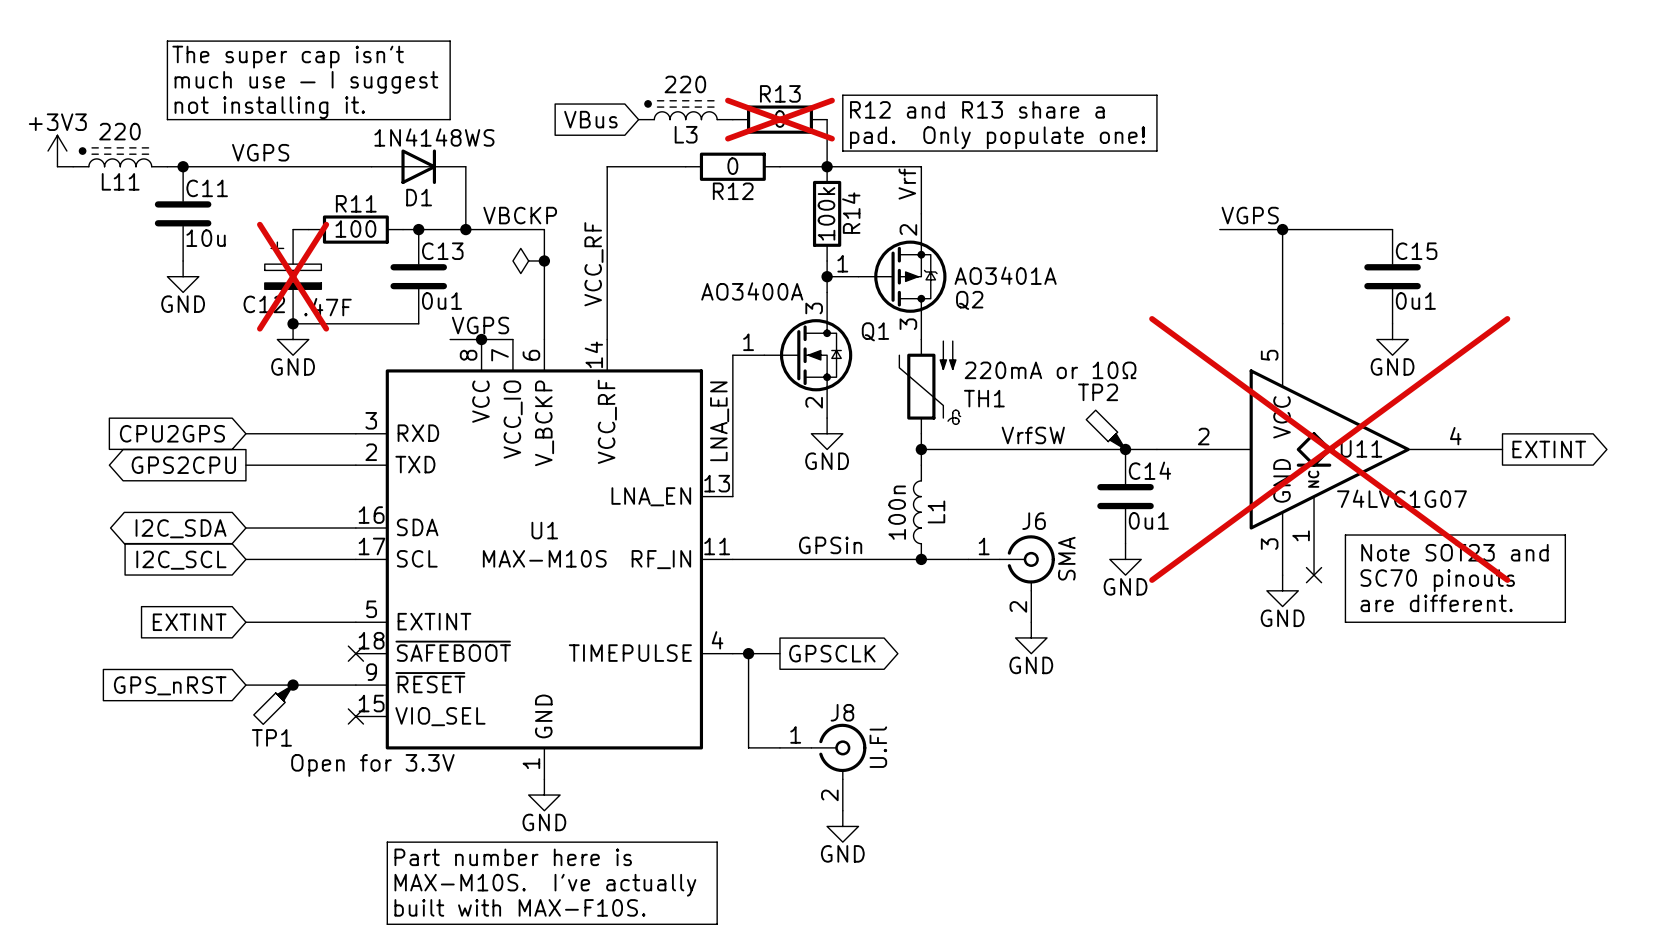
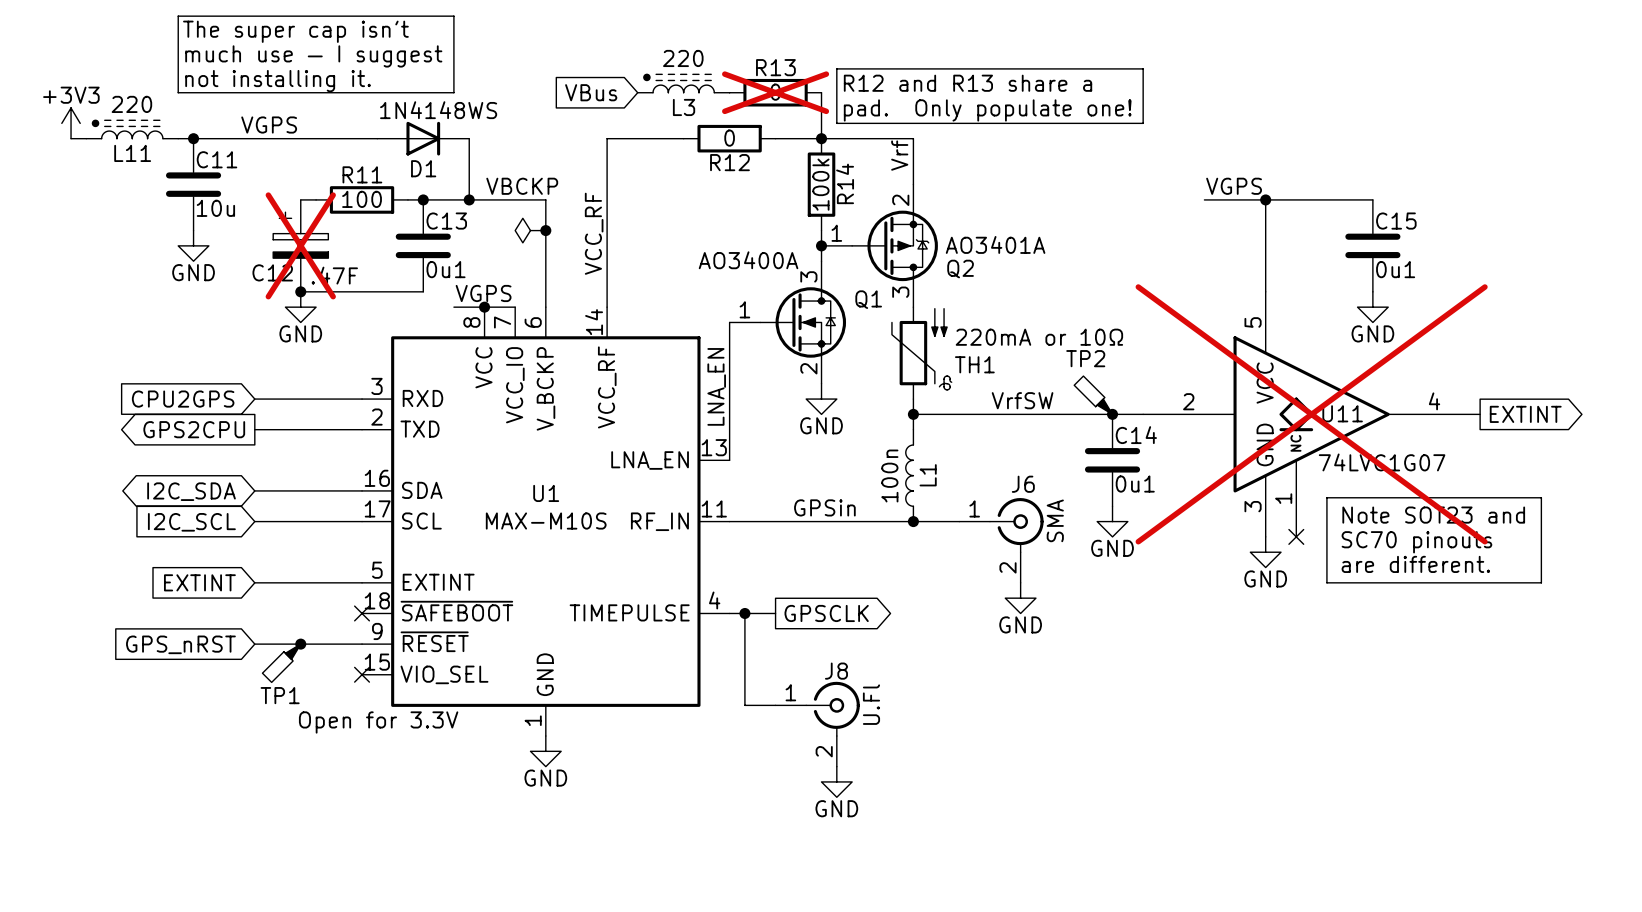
line: (387, 842) (717, 842) (717, 924) (387, 924) (387, 842) -> none
text: Part number here is (513, 857) -> none
text: MAX-M10S. I've actually (545, 885) -> none
text: built with MAX-F10S. (519, 907) -> none

